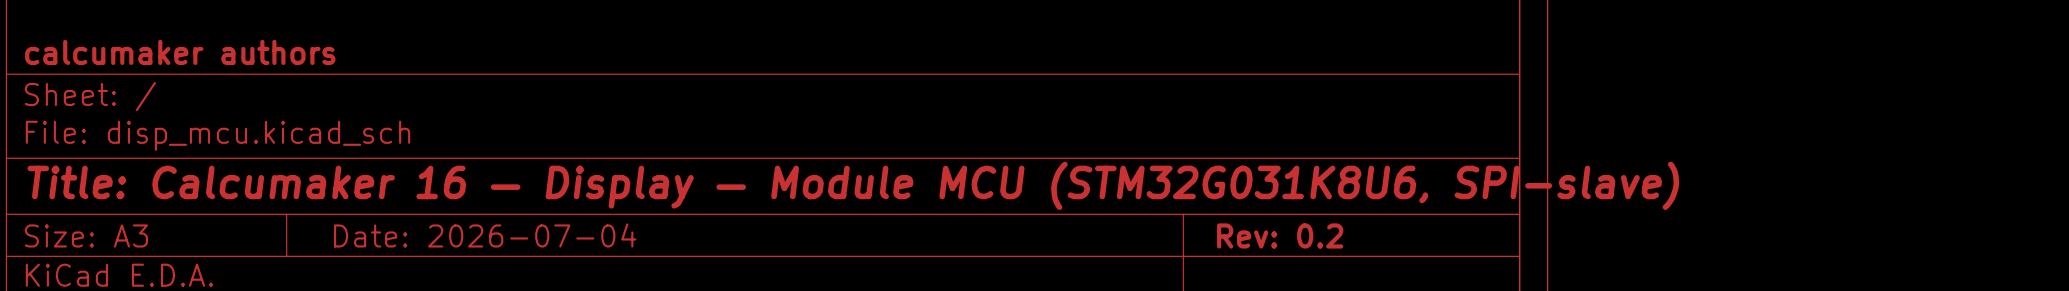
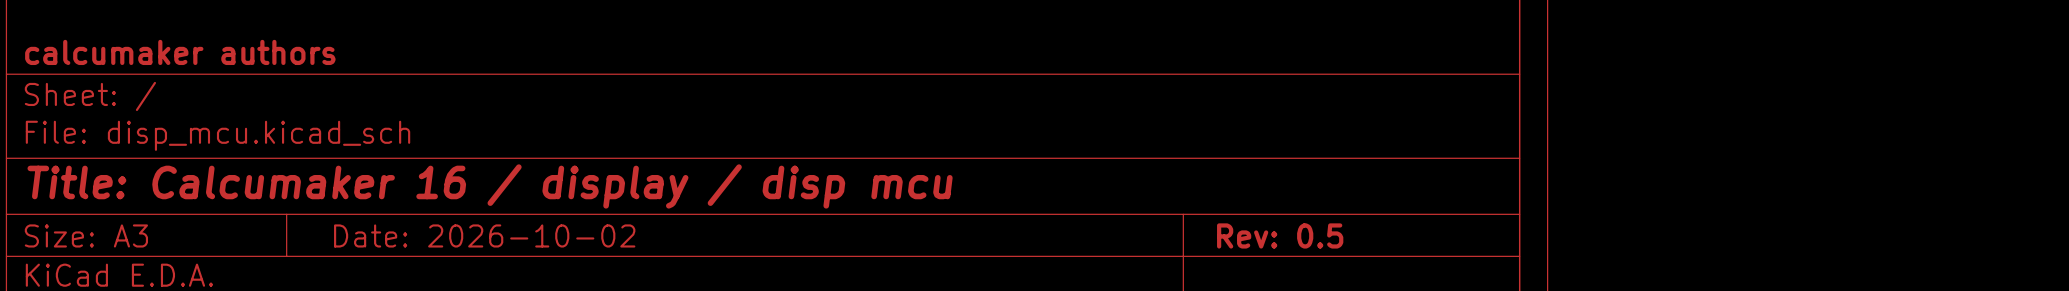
title block: Title: Calcumaker 16 — Display — Module MCU (STM32G031K8U6, SPI-slave) (853, 185) -> Title: Calcumaker 16 / display / disp mcu (490, 186)
title block: Date: 2026-07-04 (485, 235) -> Date: 2026-10-02 (484, 235)
title block: Rev: 0.2 (1280, 235) -> Rev: 0.5 (1280, 235)

